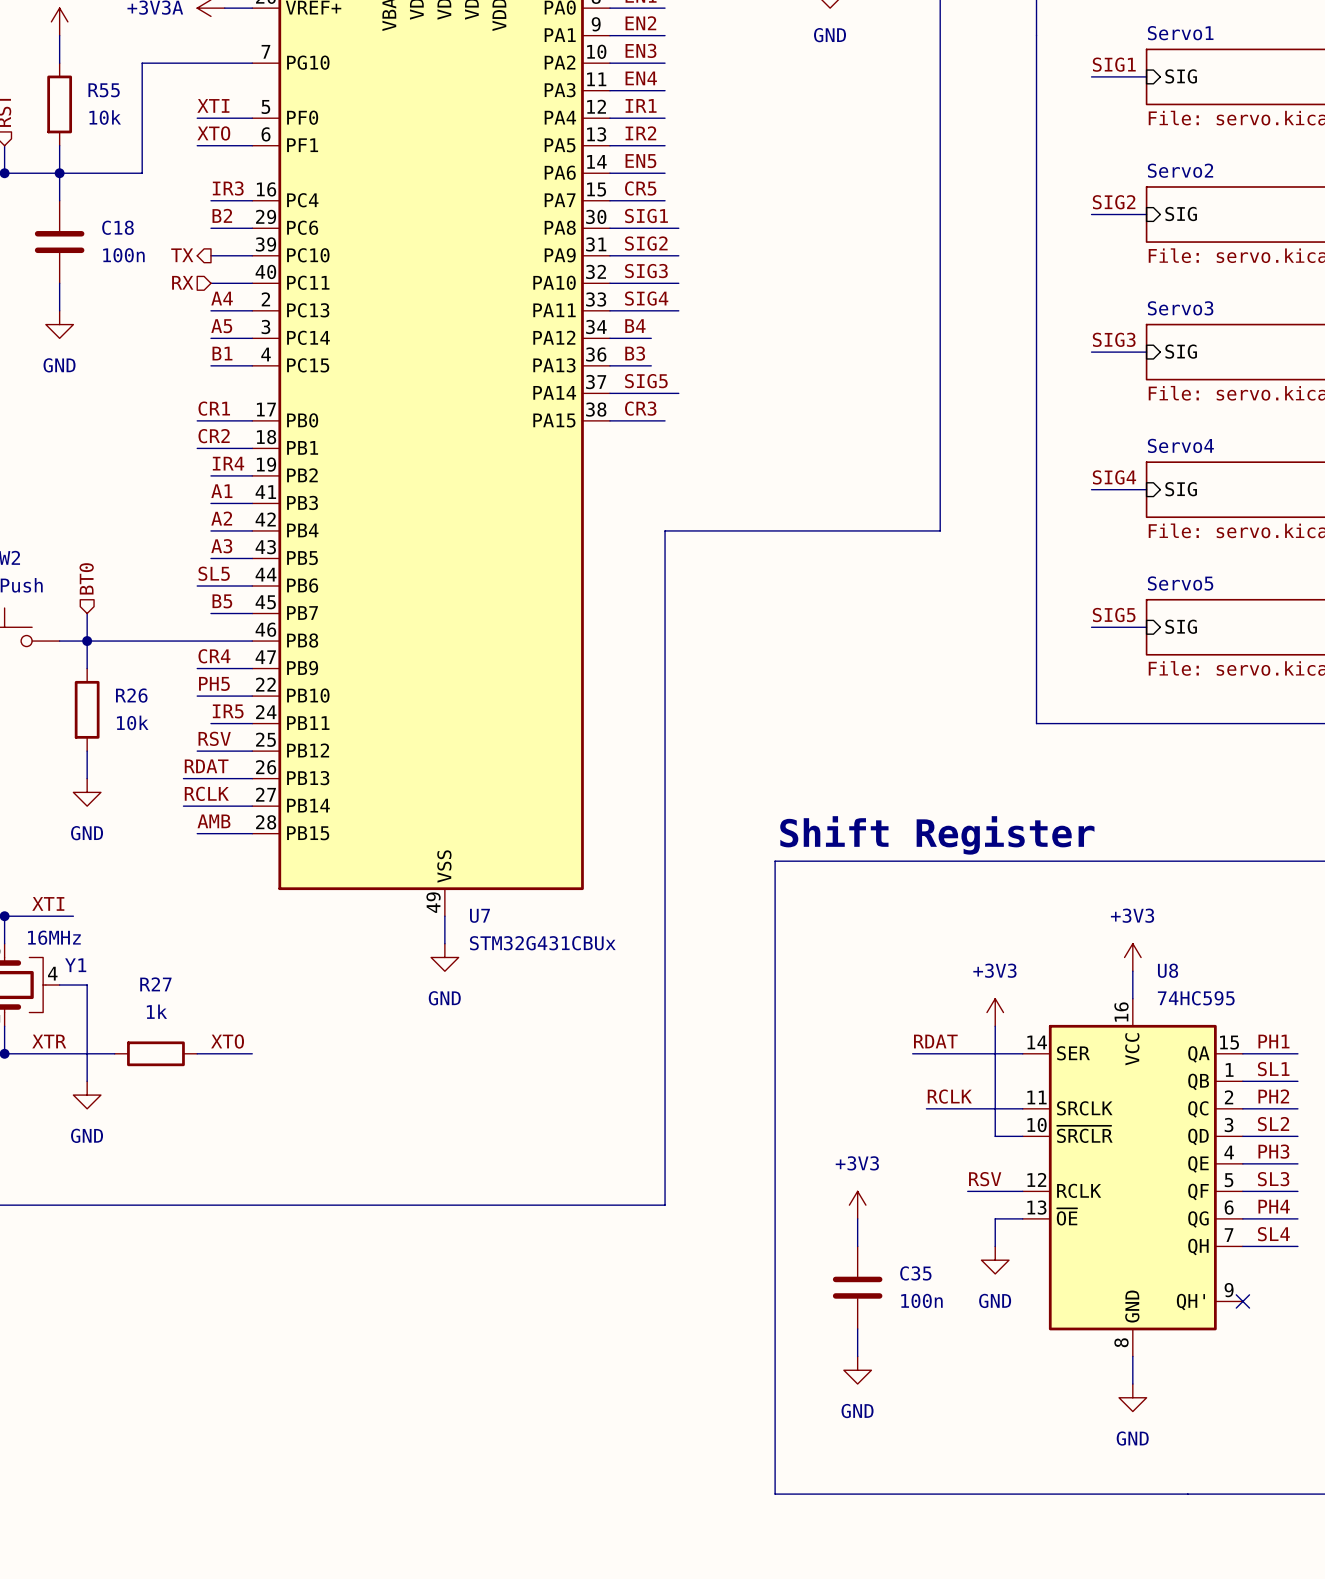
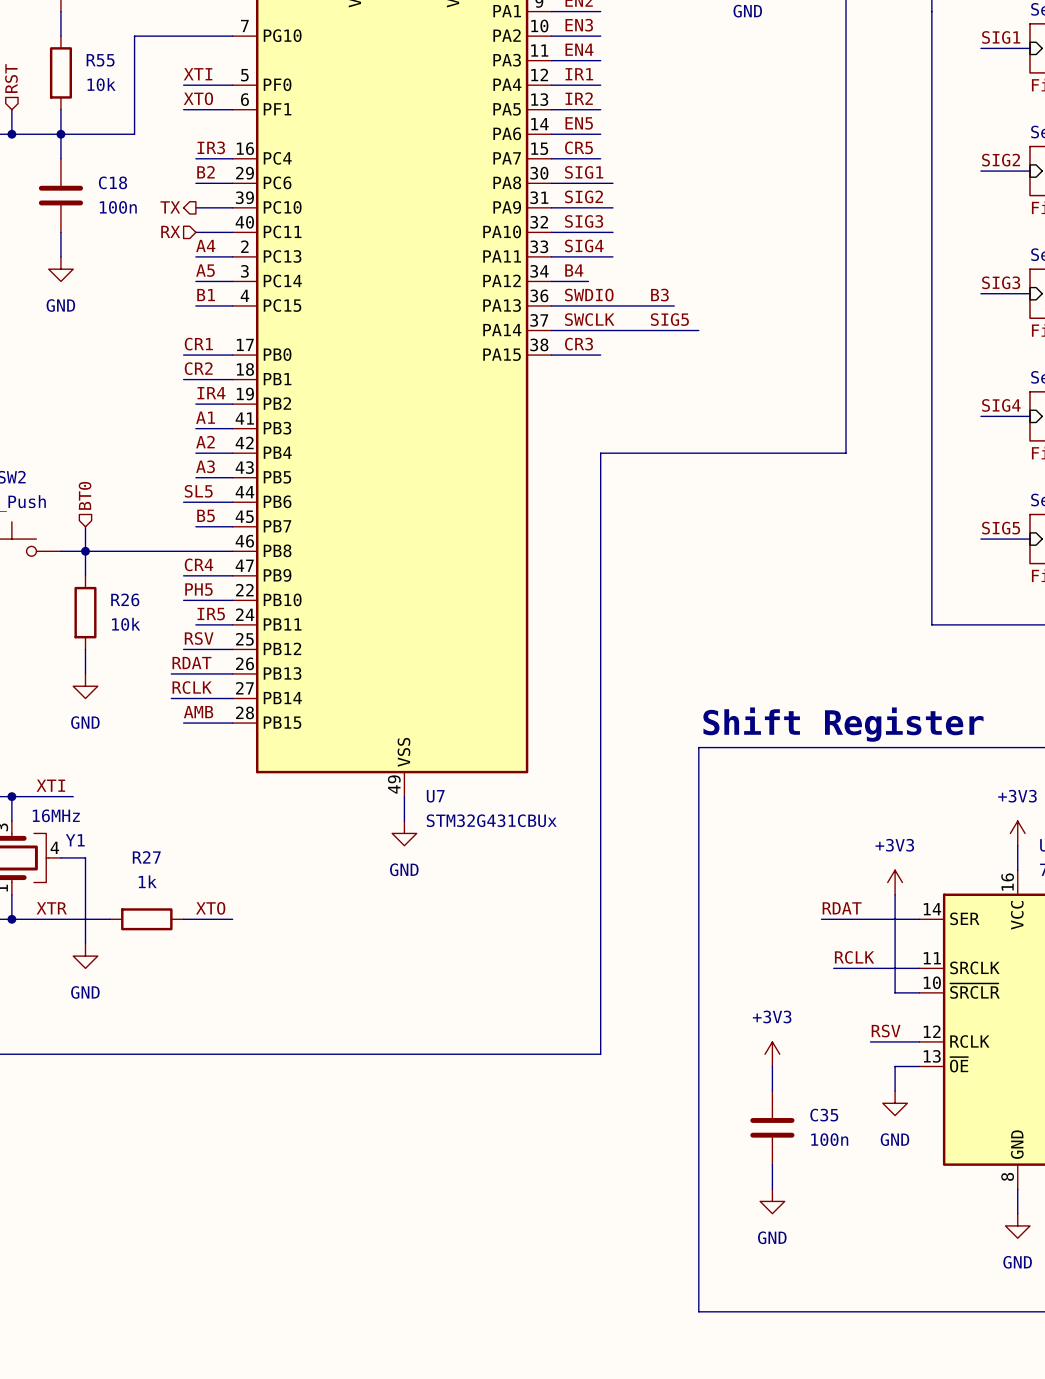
label: B3 (635, 353) -> SWDIO (589, 295)
label: none -> B3 (659, 295)
wire: none -> (588, 305) (674, 305)
label: SIG5 (646, 381) -> SWCLK (589, 319)
label: none -> SIG5 (669, 319)
wire: none -> (612, 330) (698, 330)

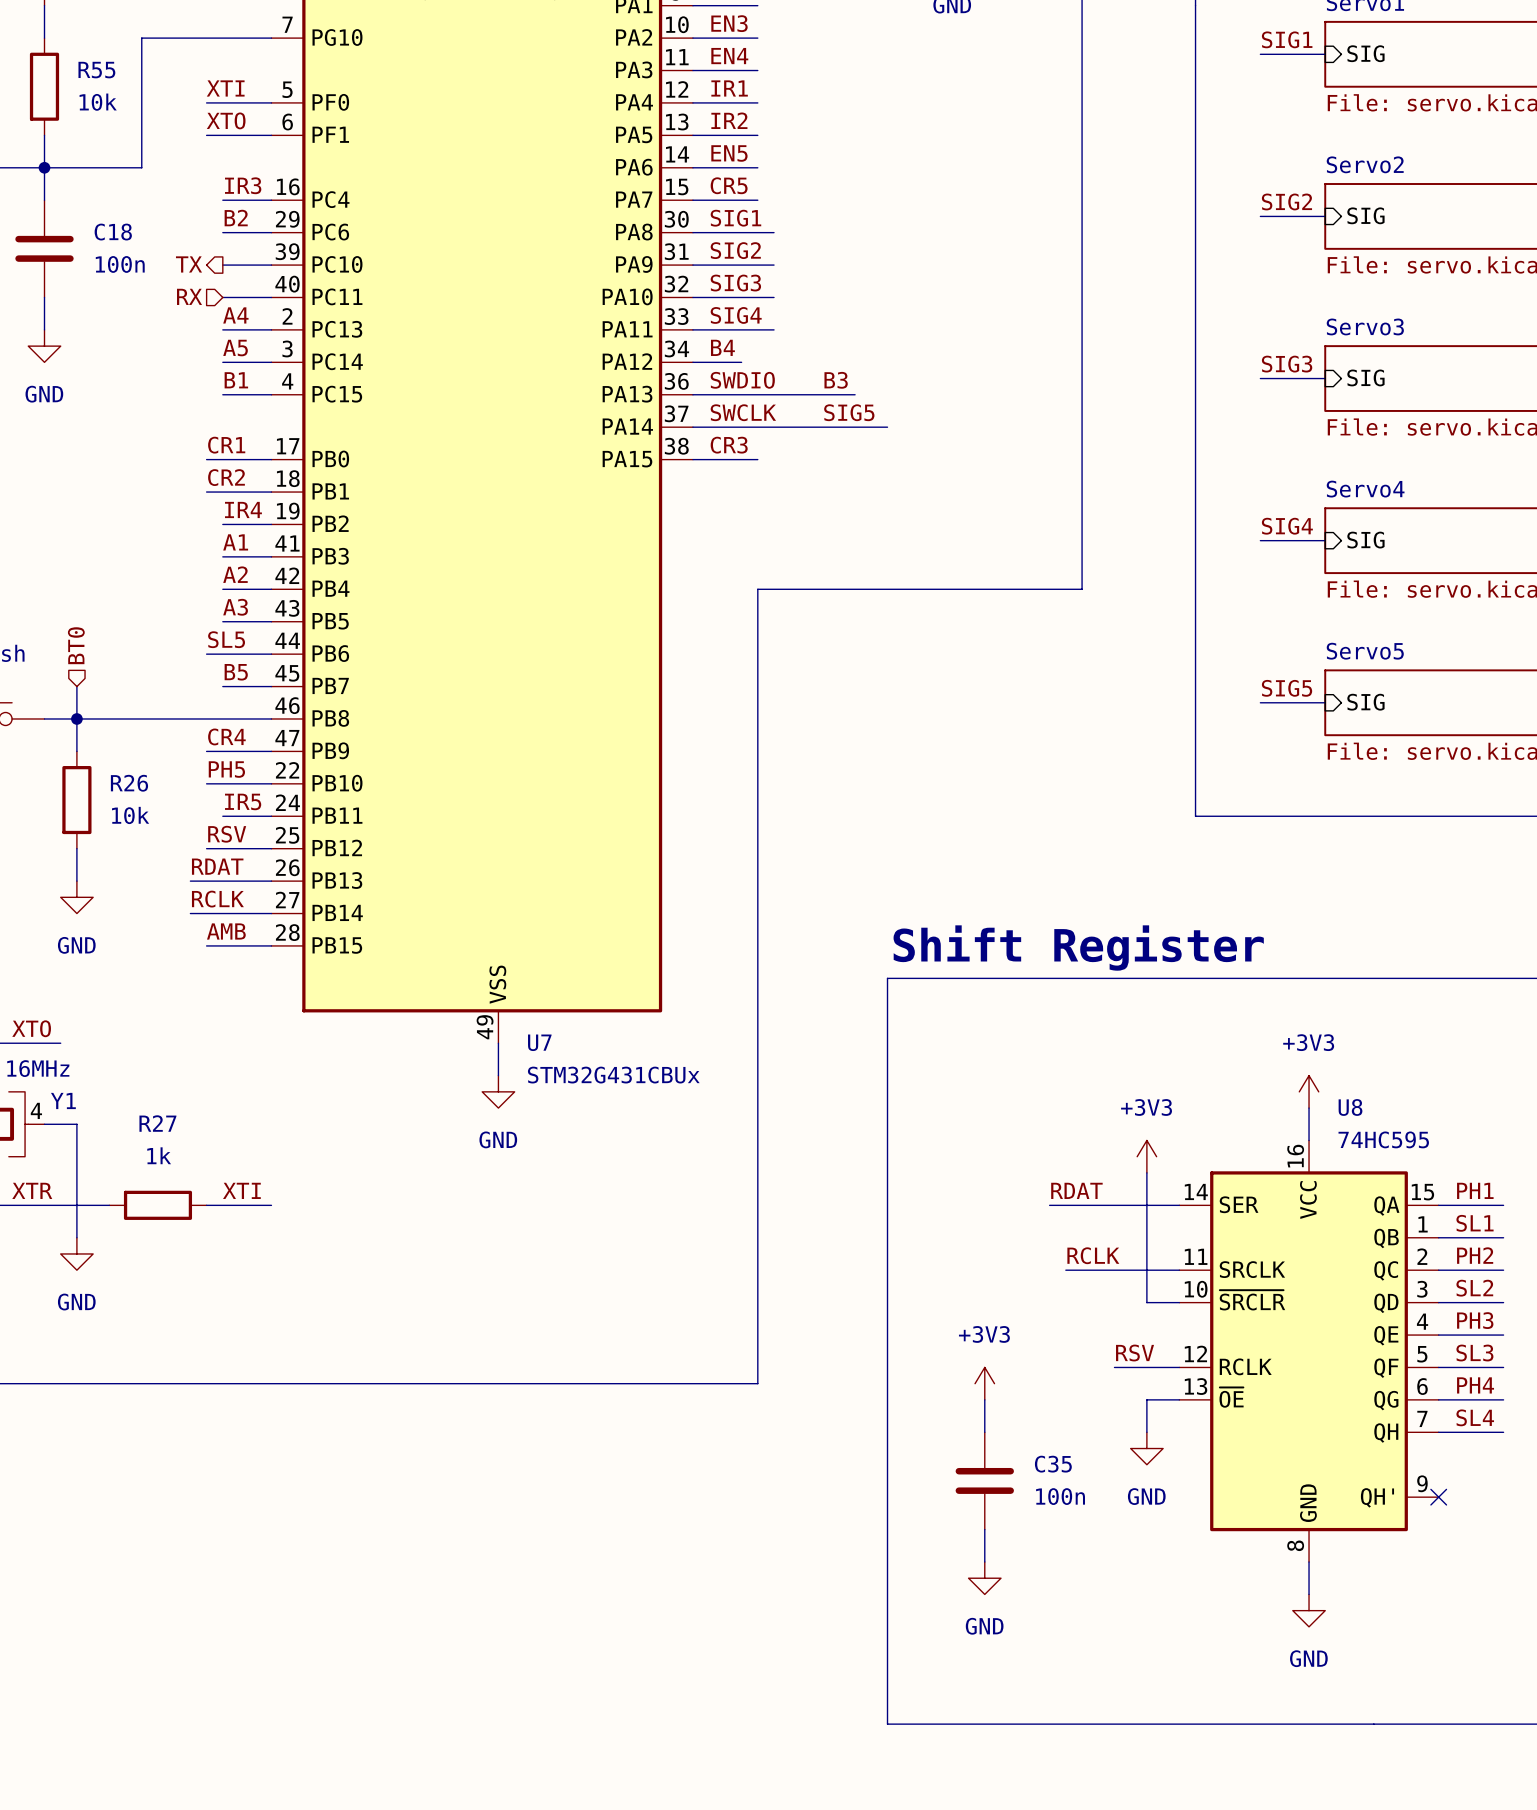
label: XTI (50, 785) -> XTO (31, 1028)
label: XTO (210, 908) -> XTI (241, 1190)

